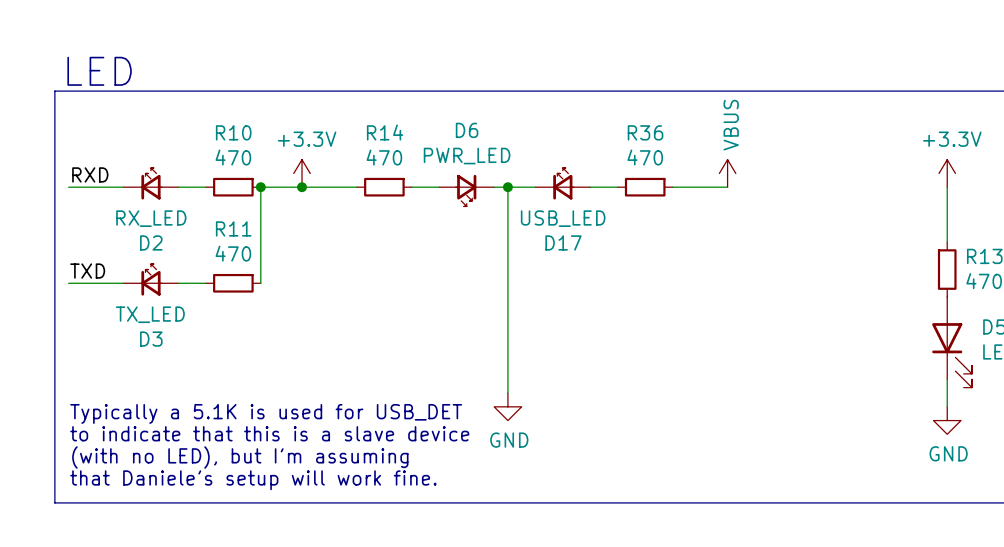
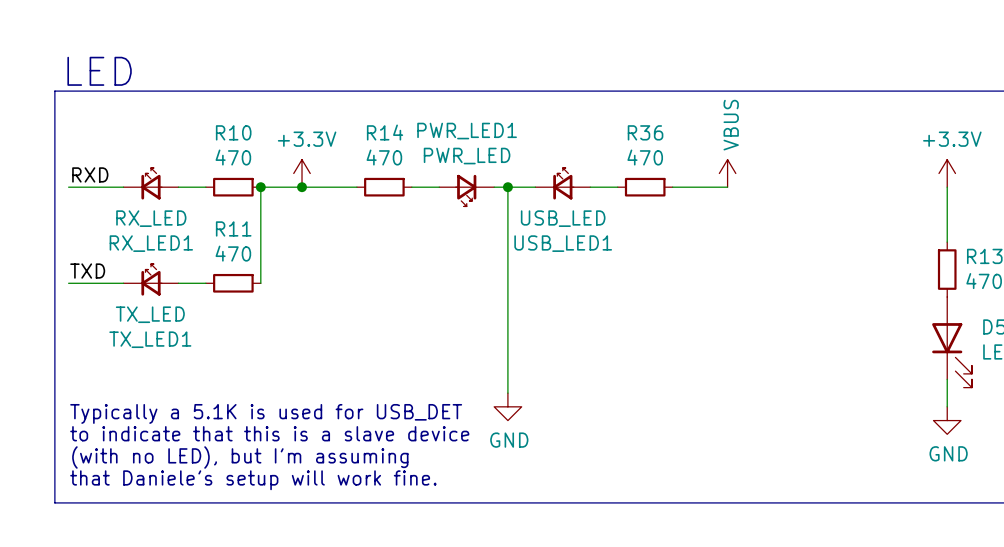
D6 name: D6 (467, 130) -> PWR_LED1 (467, 131)
D2 name: D2 (151, 242) -> RX_LED1 (151, 243)
D17 name: D17 (563, 242) -> USB_LED1 (563, 243)
D3 name: D3 (151, 339) -> TX_LED1 (150, 339)

